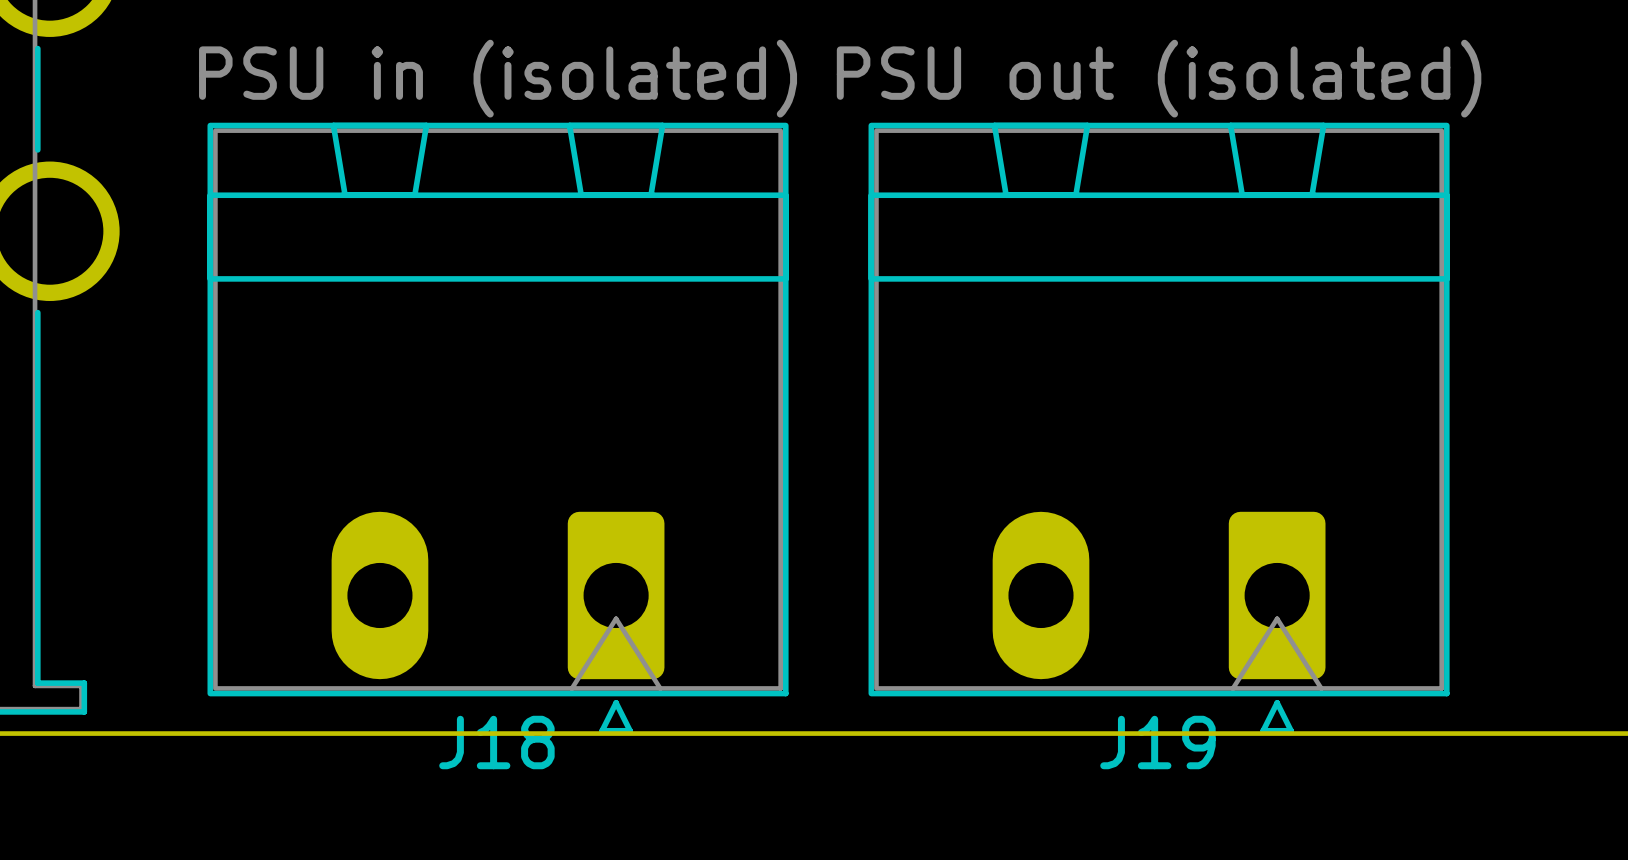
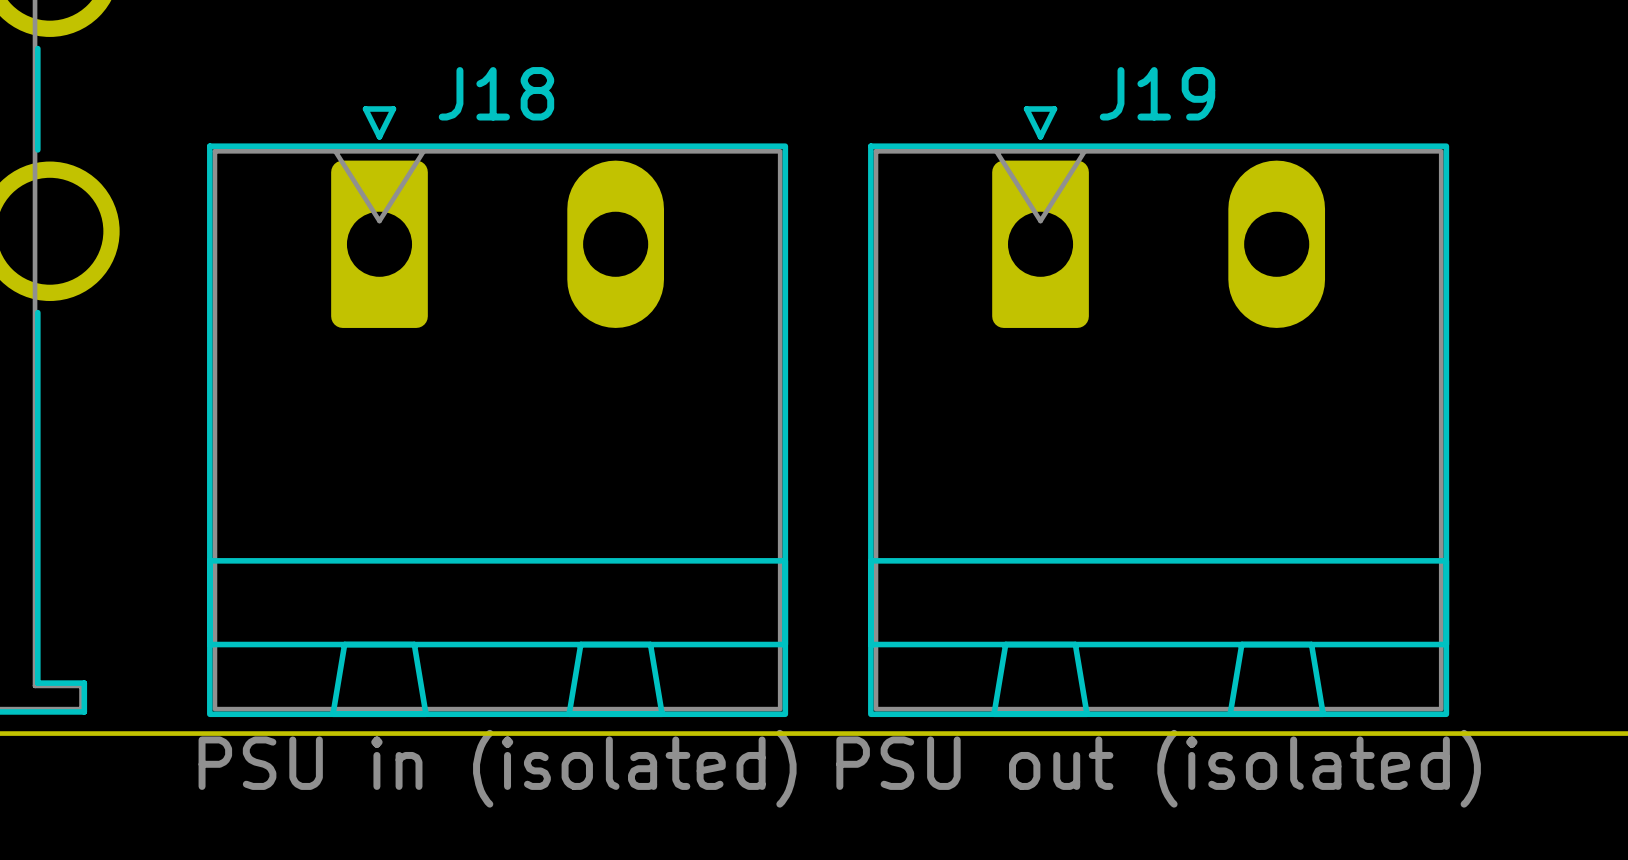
J18 rotation: 0° (498, 428) -> 180° (497, 411)
J19 rotation: 0° (1159, 428) -> 180° (1158, 411)

